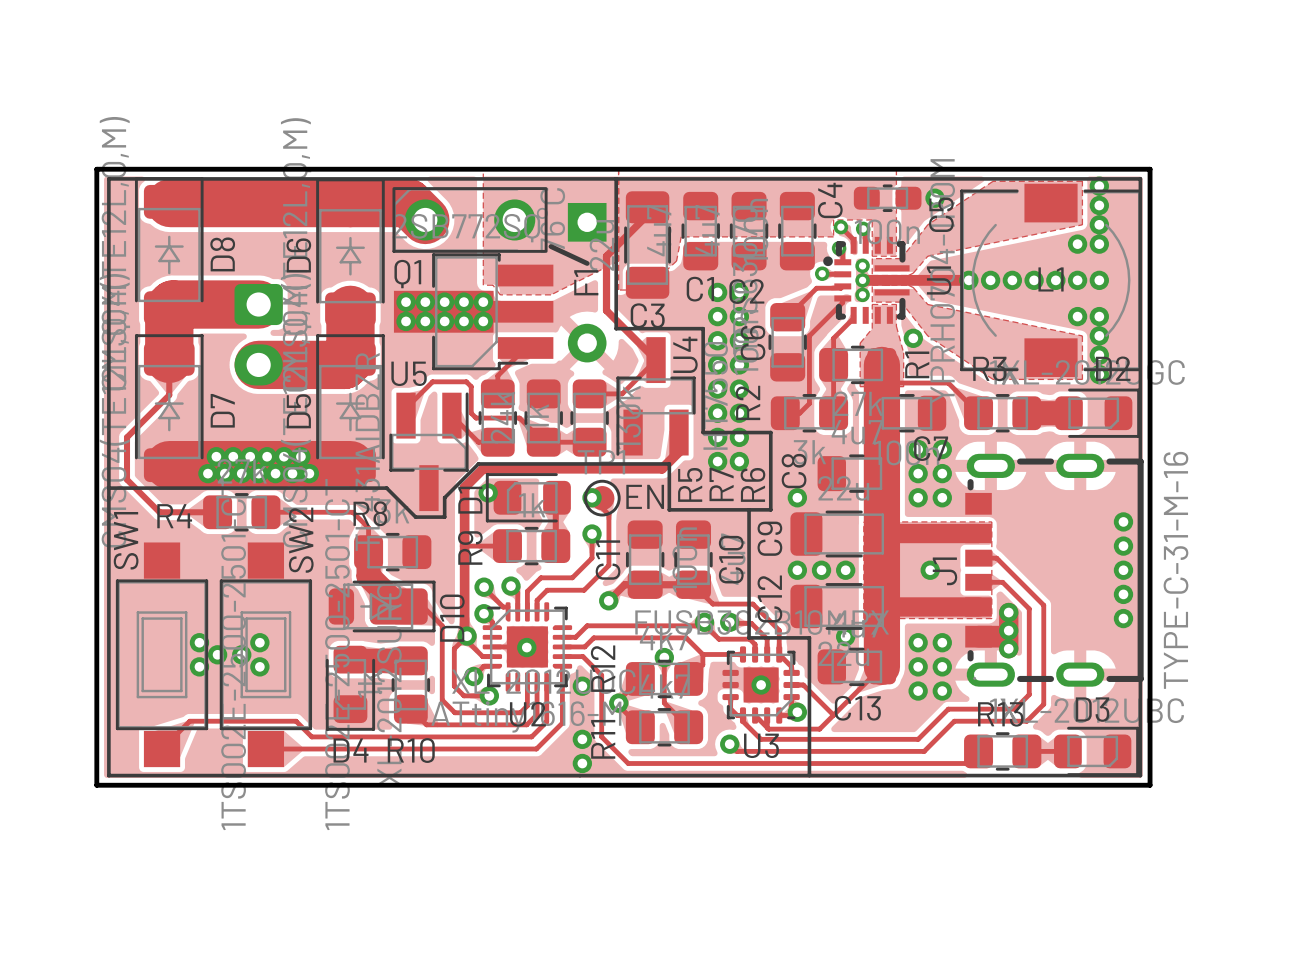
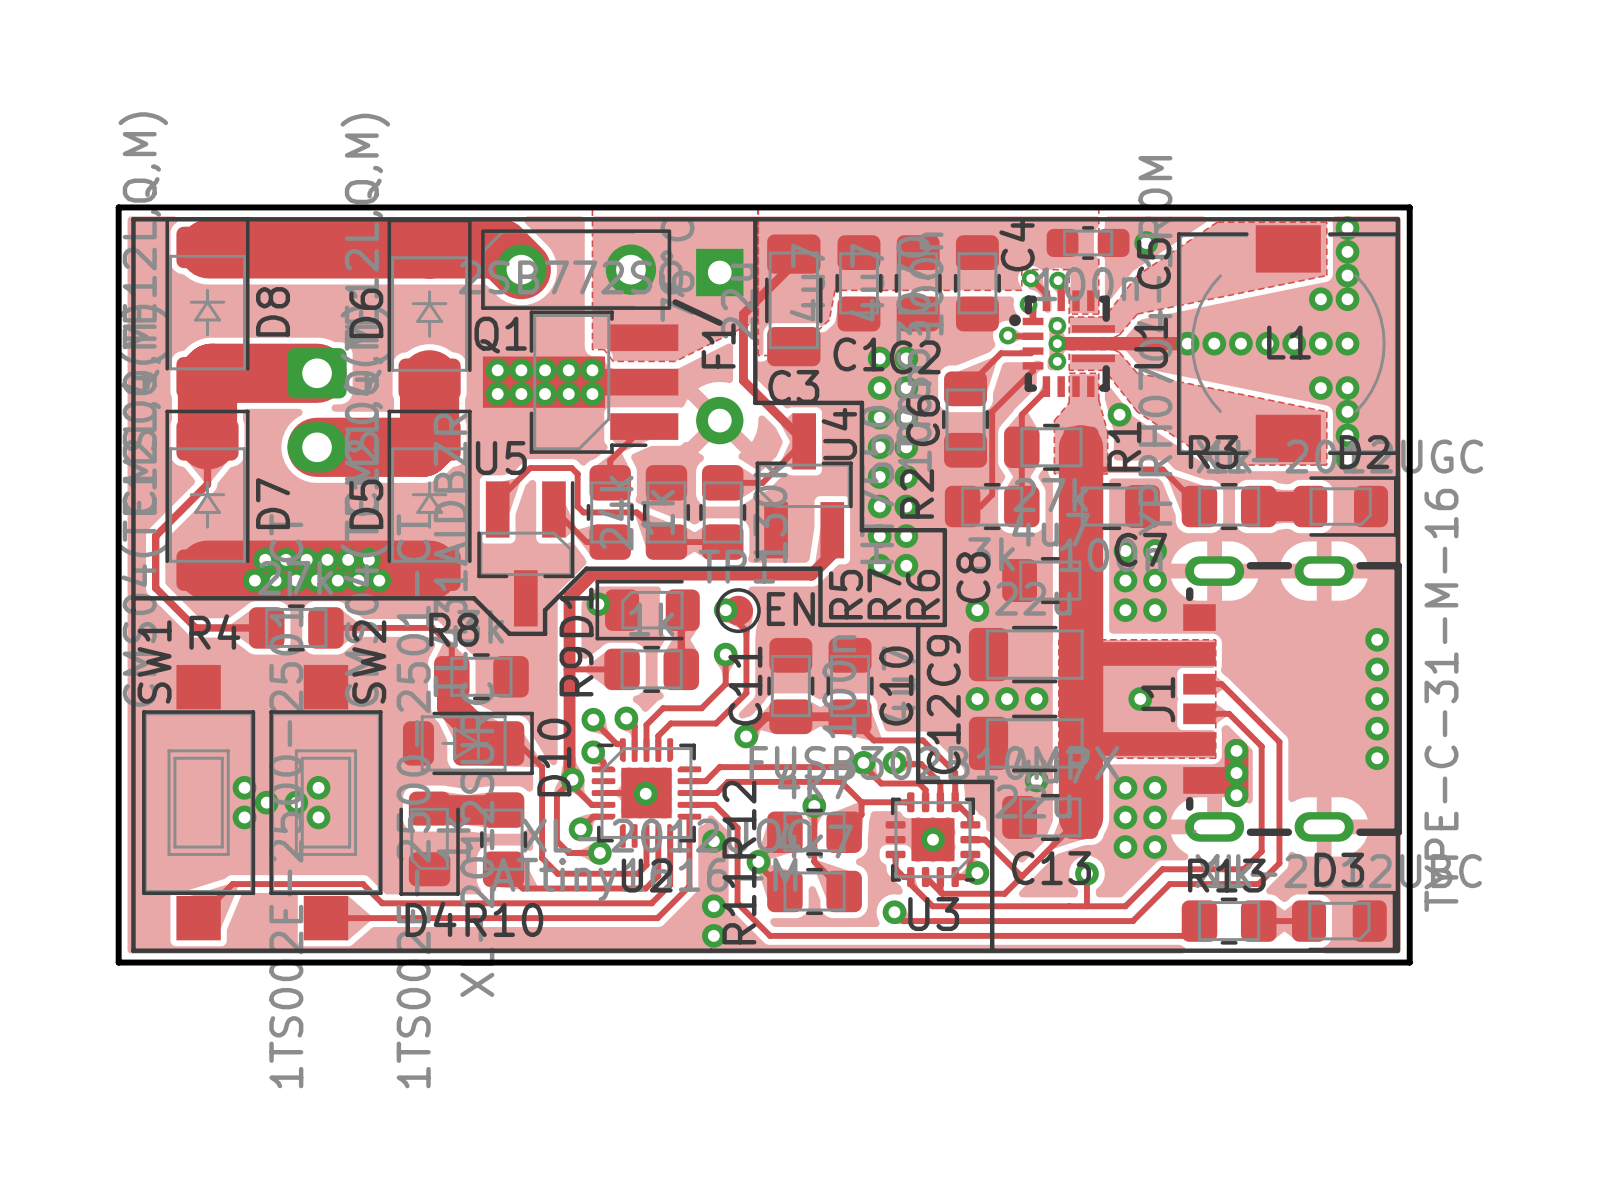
track: none -> (1086, 873) (1086, 906)
via: none -> (1086, 873)

